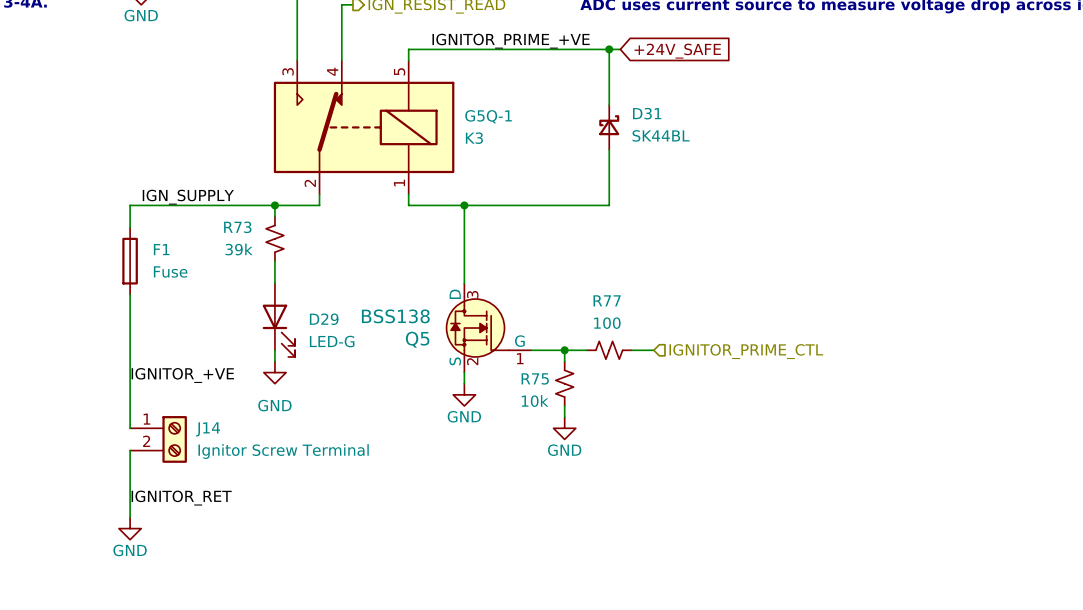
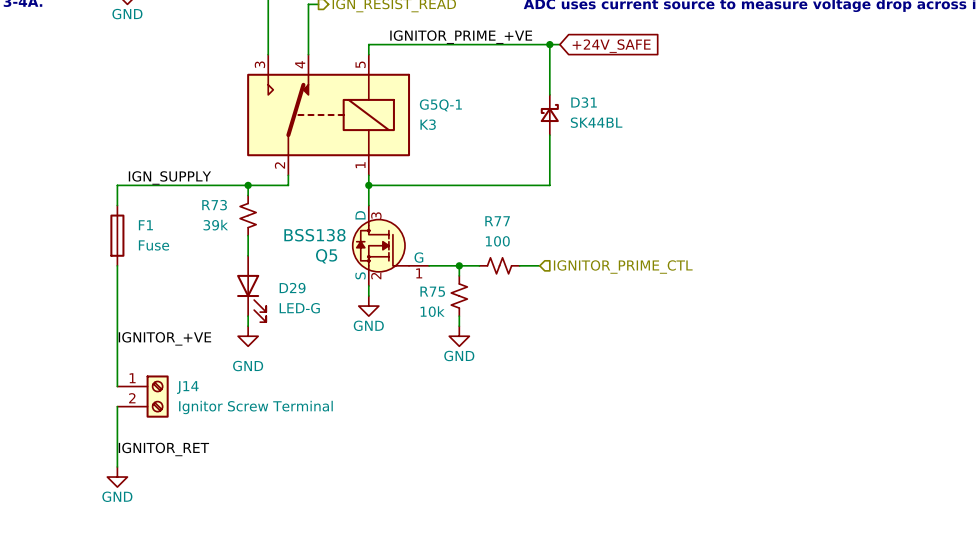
wire: none -> (368, 185) (368, 205)
junction: none -> (368, 185)
wire: (464, 205) (464, 283) -> none
junction: (464, 205) -> none
junction: none -> (459, 265)
Q5 value position: BSS138 (395, 316) -> BSS138 (314, 235)
Q5 position: (488, 328) -> (390, 245)
power symbol: none -> GND (368, 306)
wire: (531, 350) (586, 350) -> (429, 265) (479, 265)
wire: (564, 350) (564, 361) -> (459, 265) (459, 275)
junction: (564, 350) -> none
R77 position: (609, 350) -> (499, 265)
wire: (631, 350) (653, 350) -> (519, 265) (539, 265)
hierarchical label position: IGNITOR_PRIME_CTL (746, 351) -> IGNITOR_PRIME_CTL (623, 267)
wire: (464, 372) (464, 383) -> (368, 285) (368, 296)
power symbol: none -> GND (459, 336)
R75 position: (564, 383) -> (459, 296)
power symbol: GND (464, 394) -> none
wire: (564, 406) (564, 417) -> (459, 316) (459, 326)
power symbol: GND (564, 428) -> none

